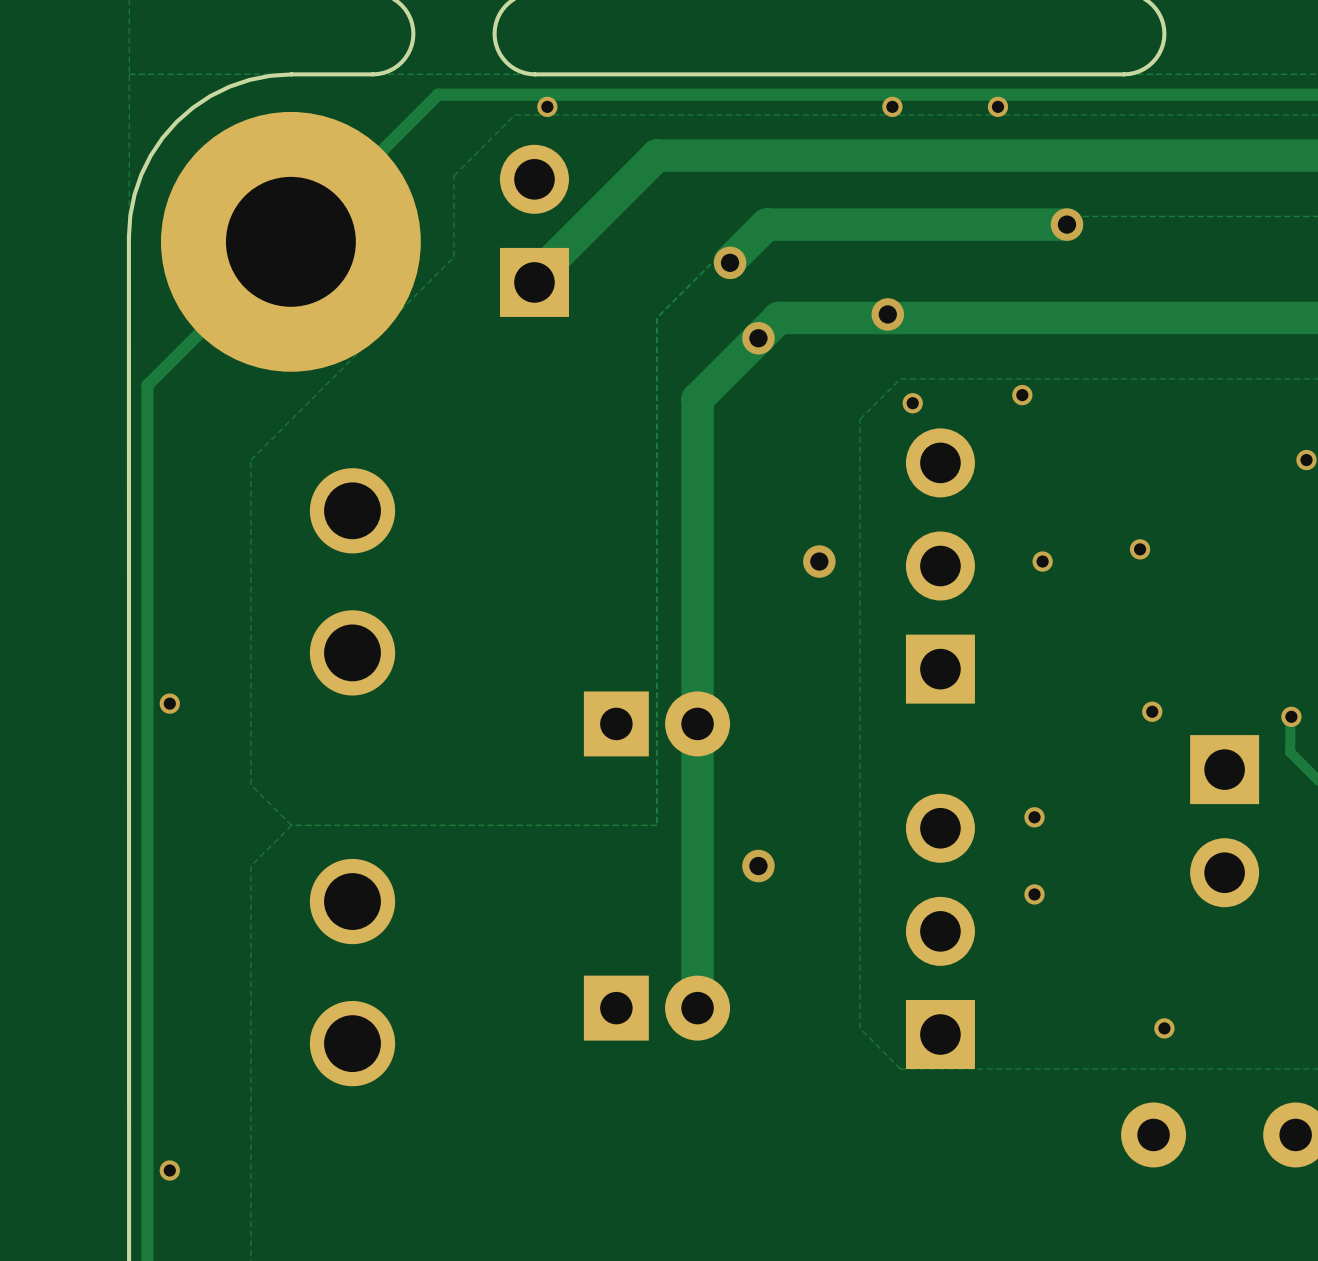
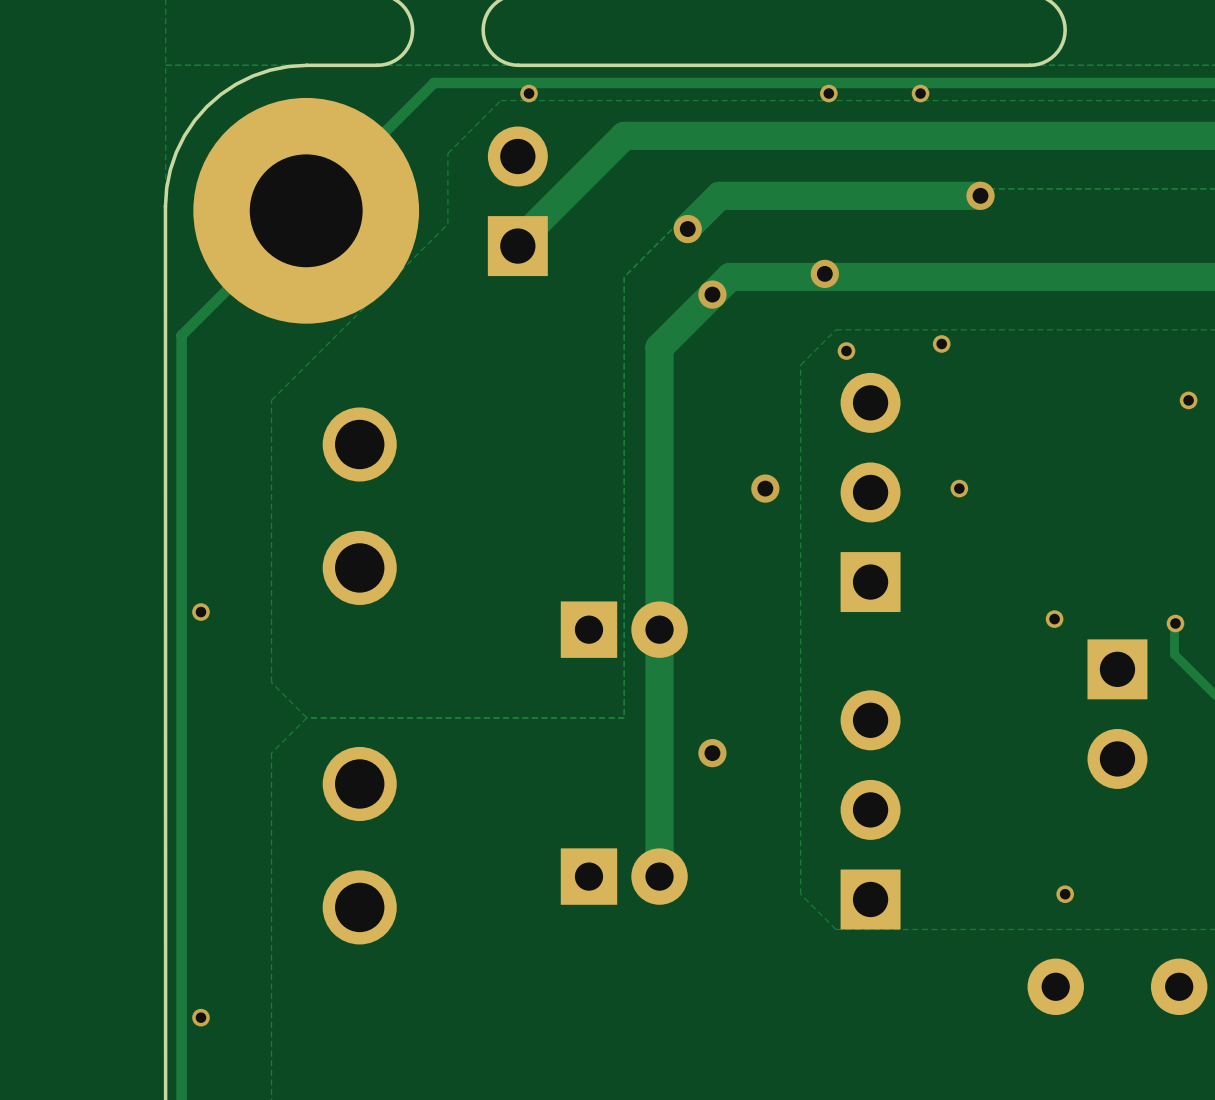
via: (1140, 549) -> none
via: (1034, 817) -> none
via: (1034, 894) -> none

